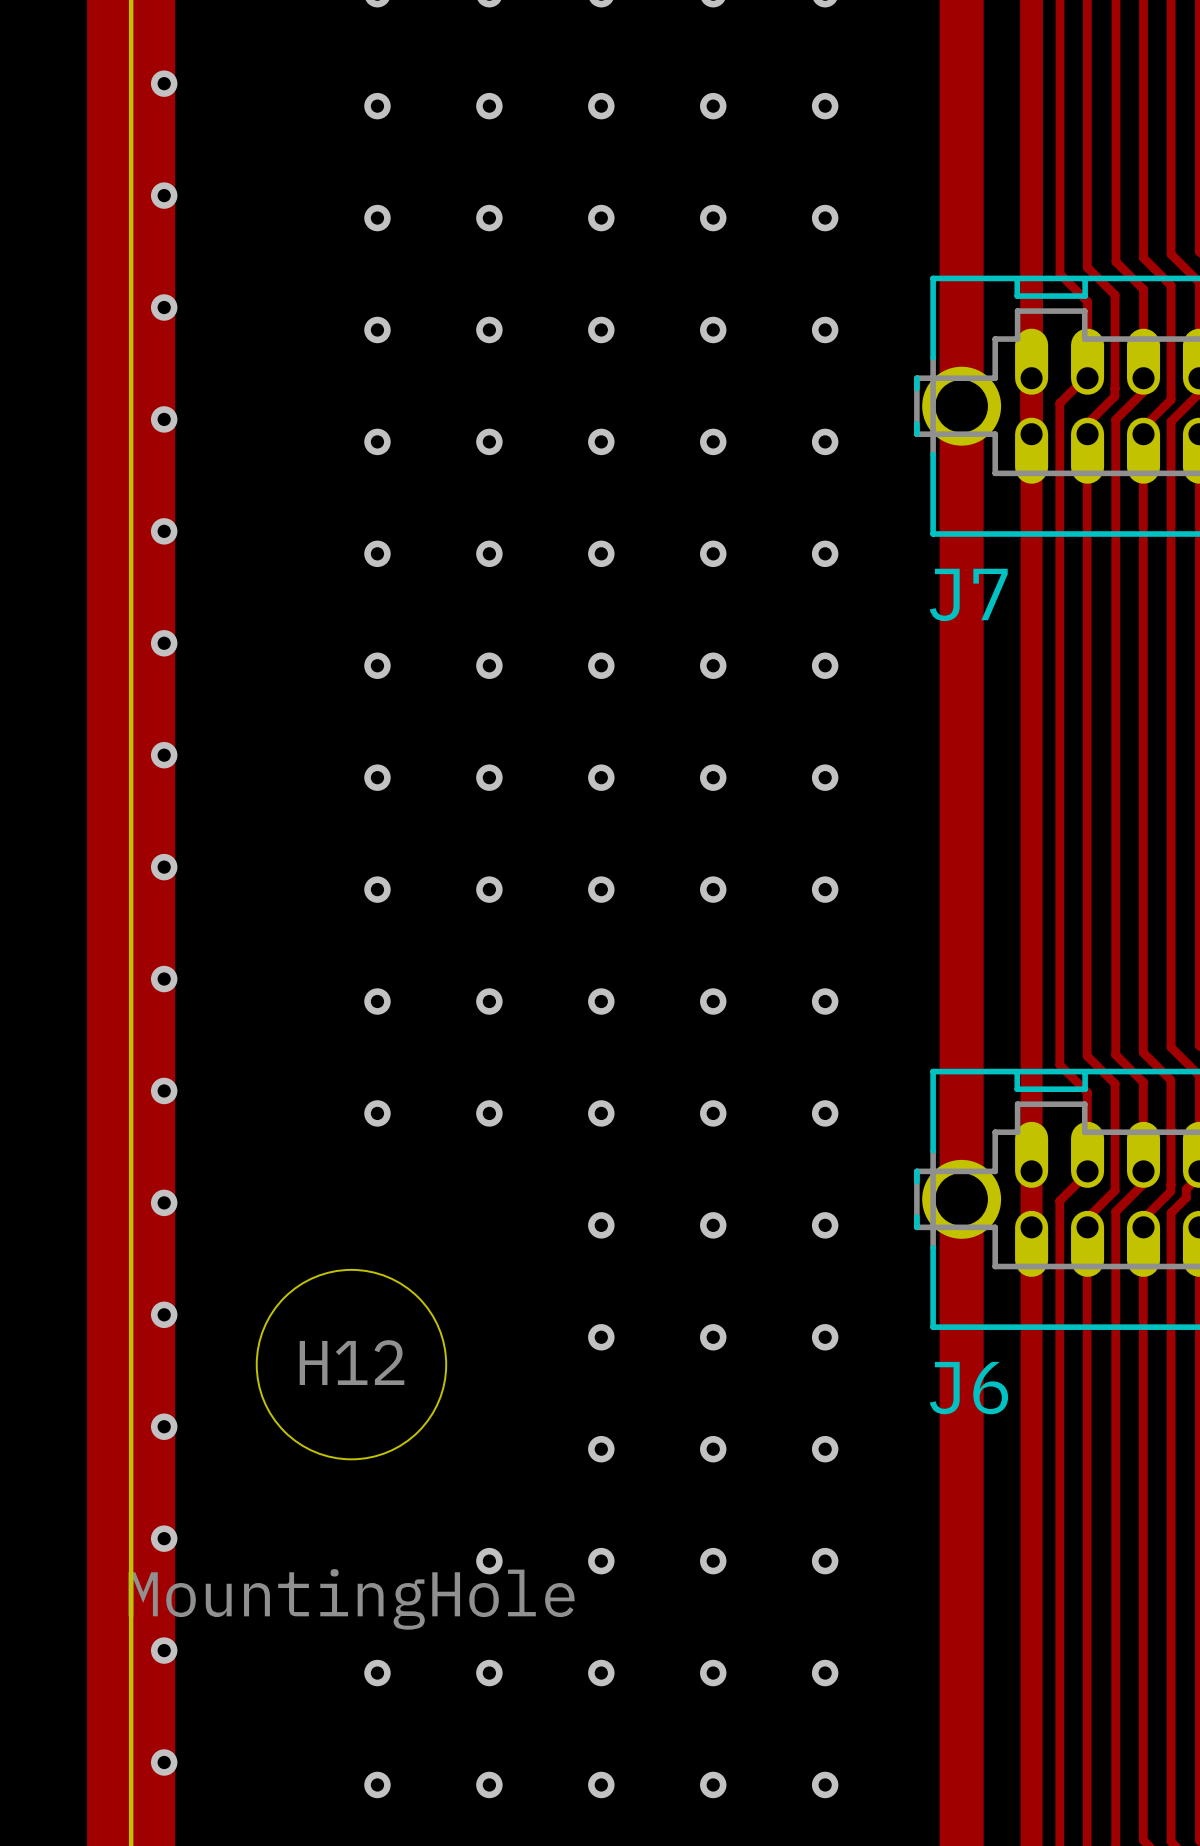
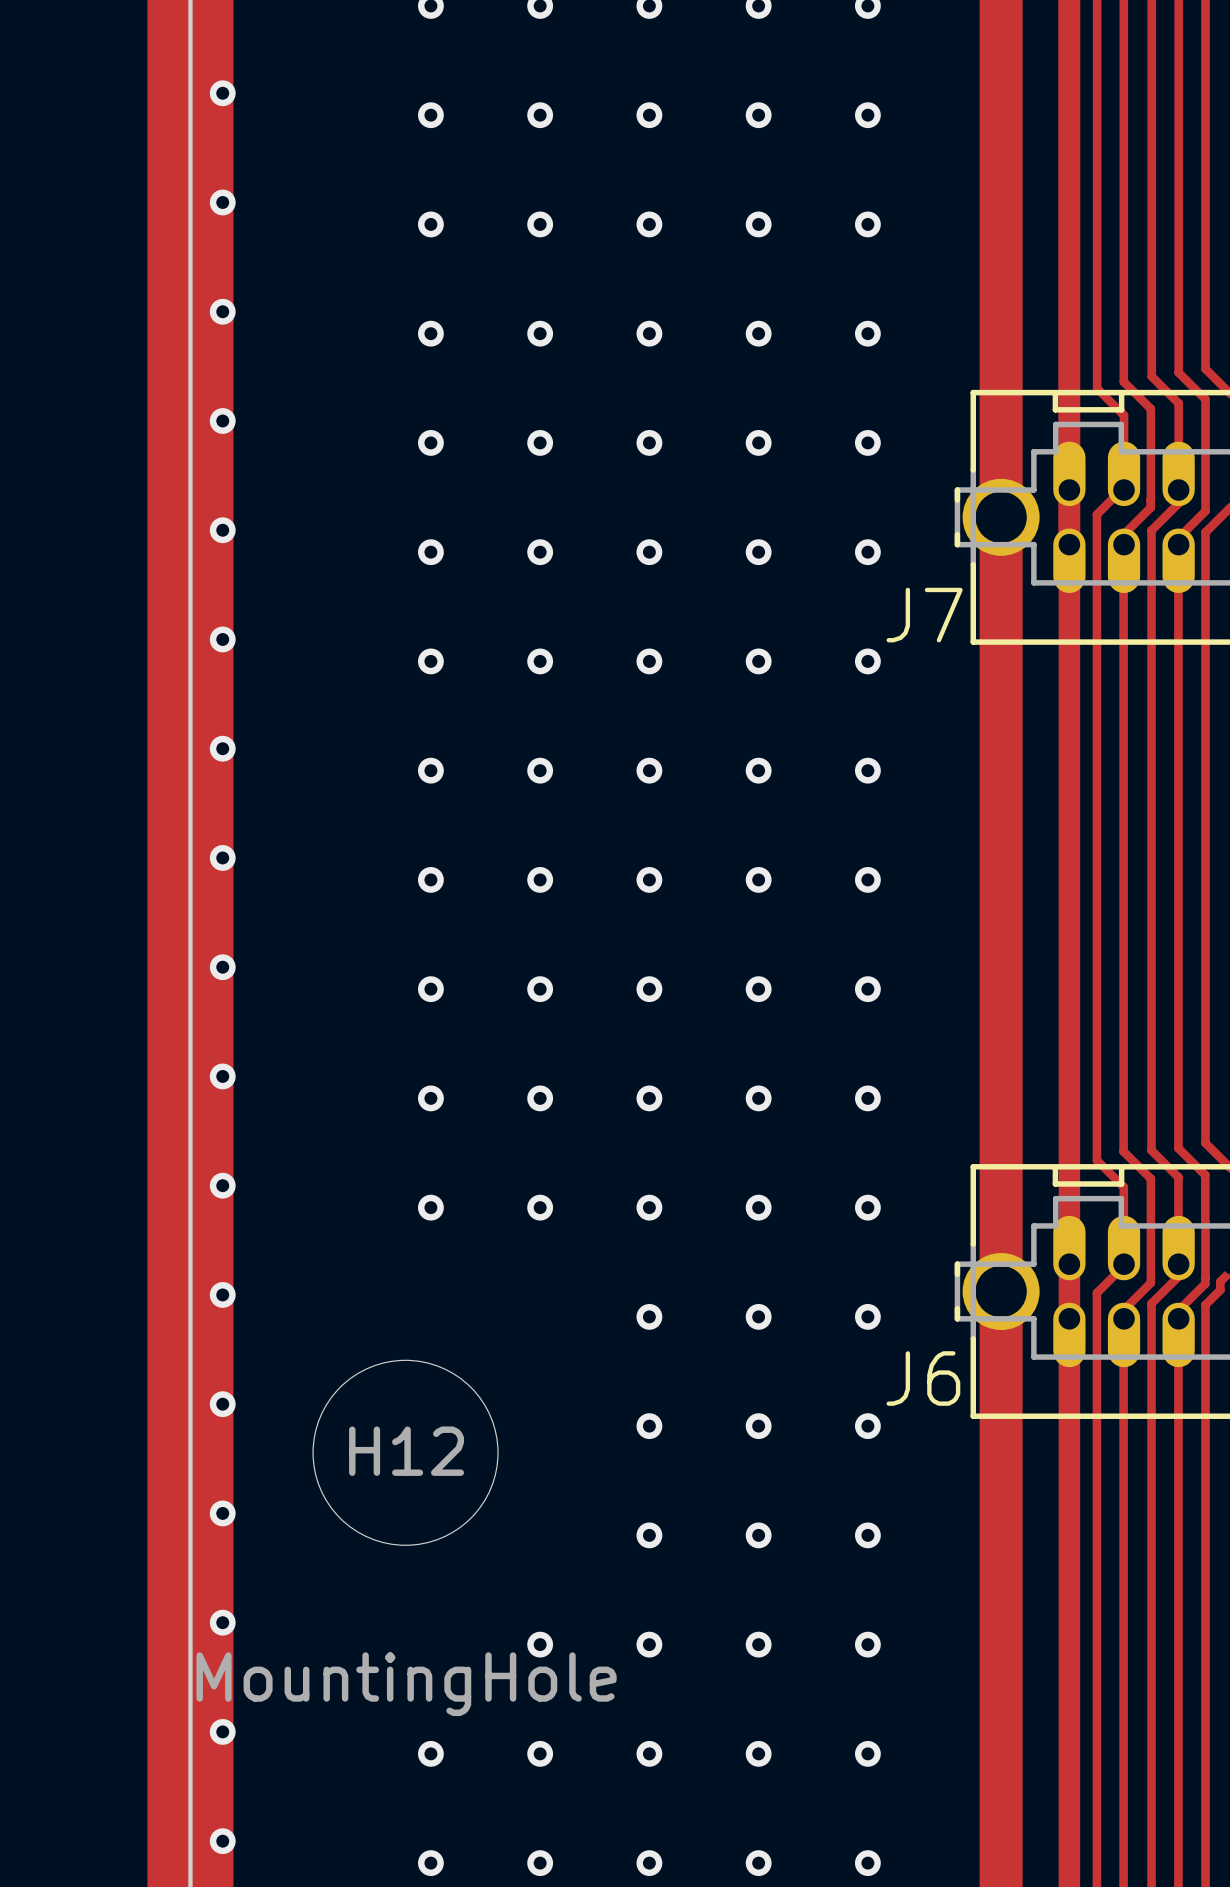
J7 name position: J7 (968, 594) -> J7 (924, 615)
J6 name position: J6 (968, 1388) -> J6 (923, 1378)

